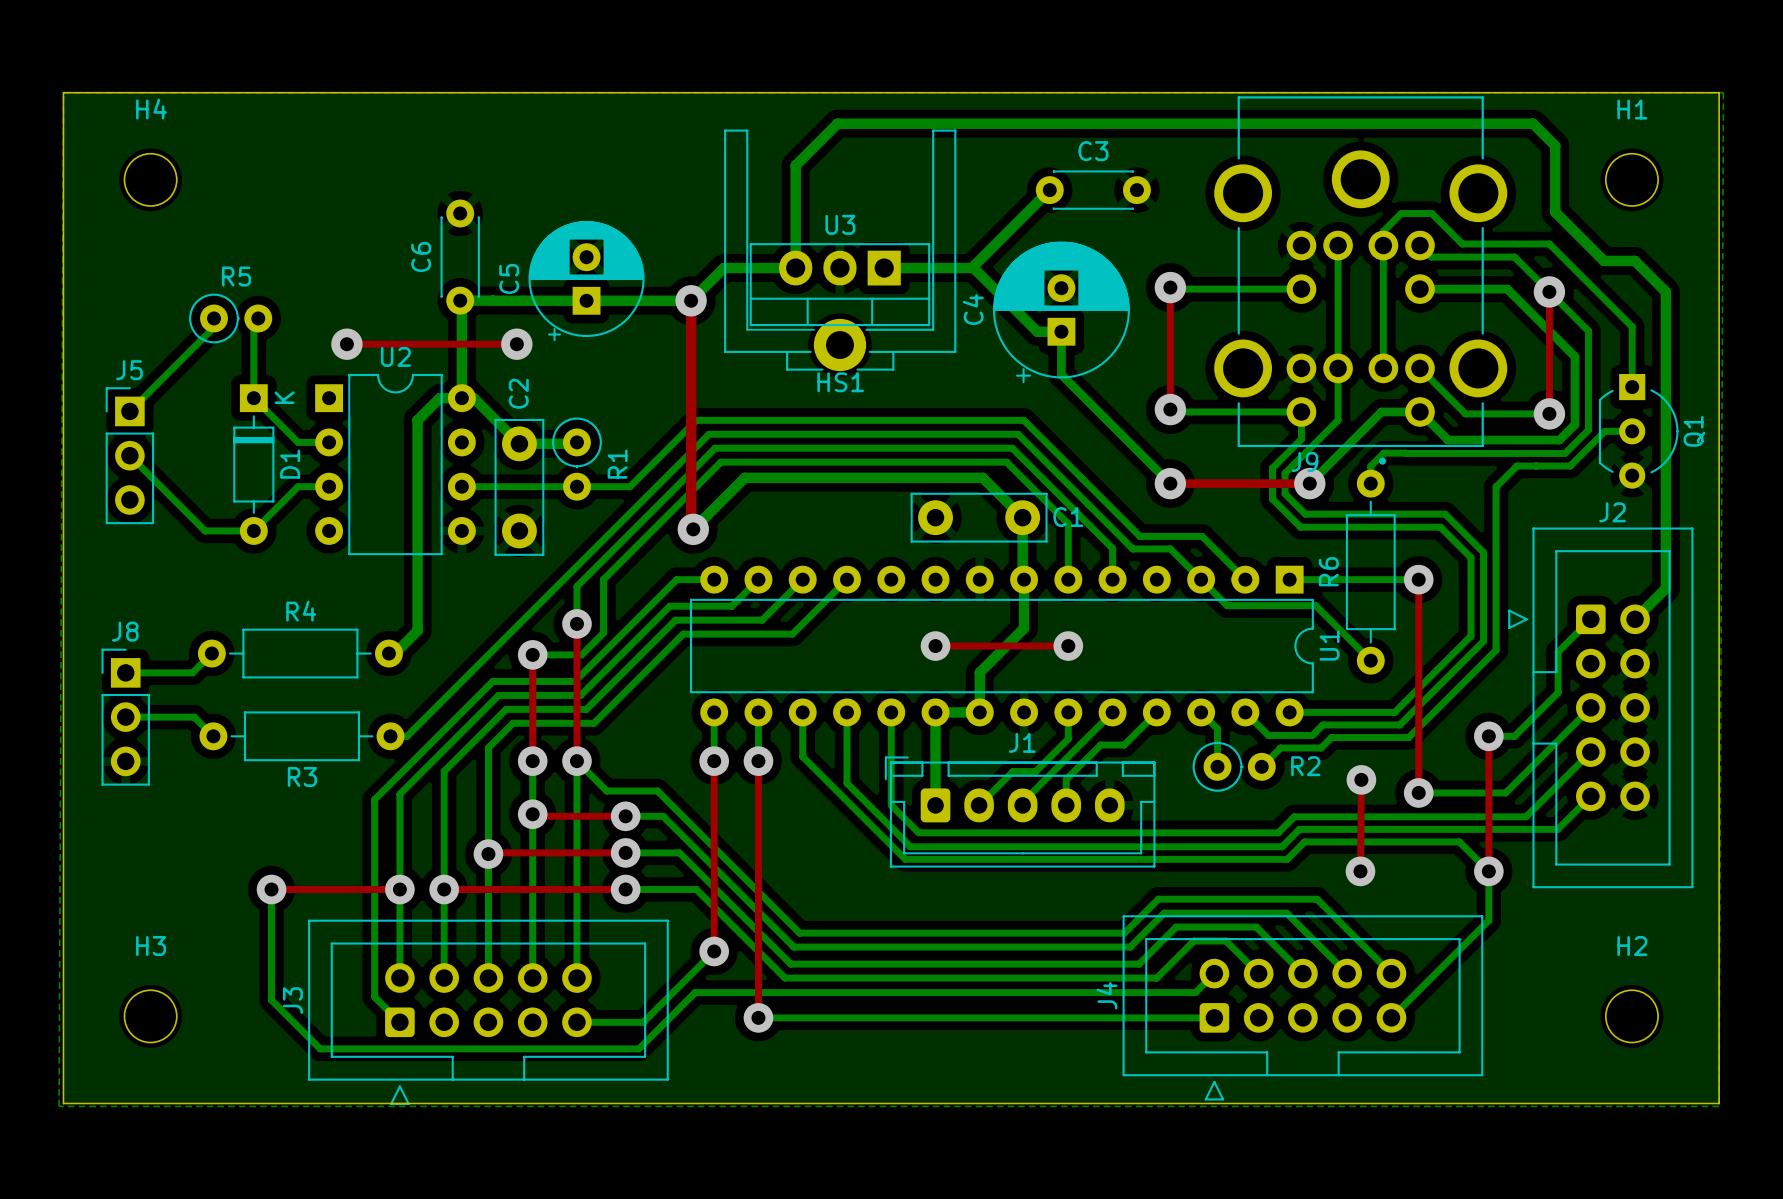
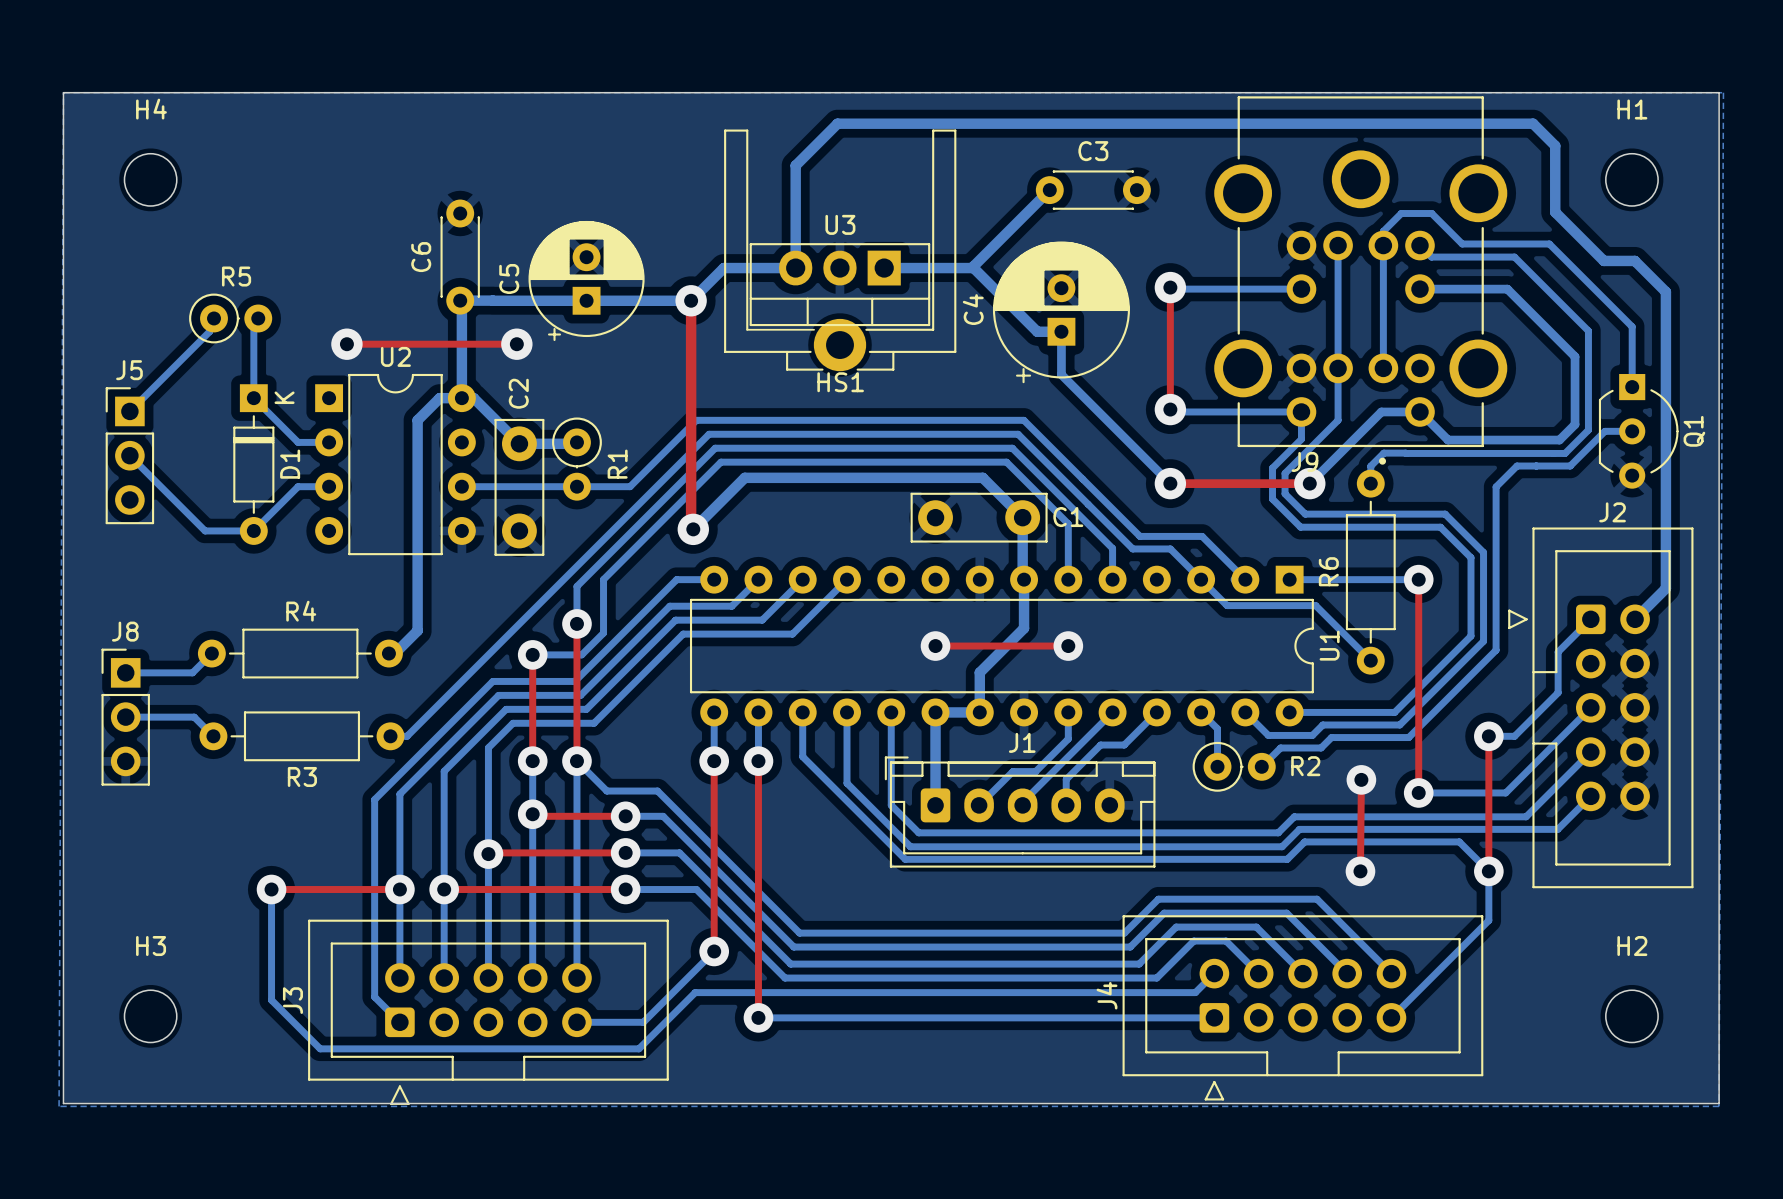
top track: (1549, 291) (1549, 413) -> none
via: (1549, 291) -> none
bottom track: (1419, 368) (1465, 413) (1549, 413) -> none
via: (1549, 413) -> none

